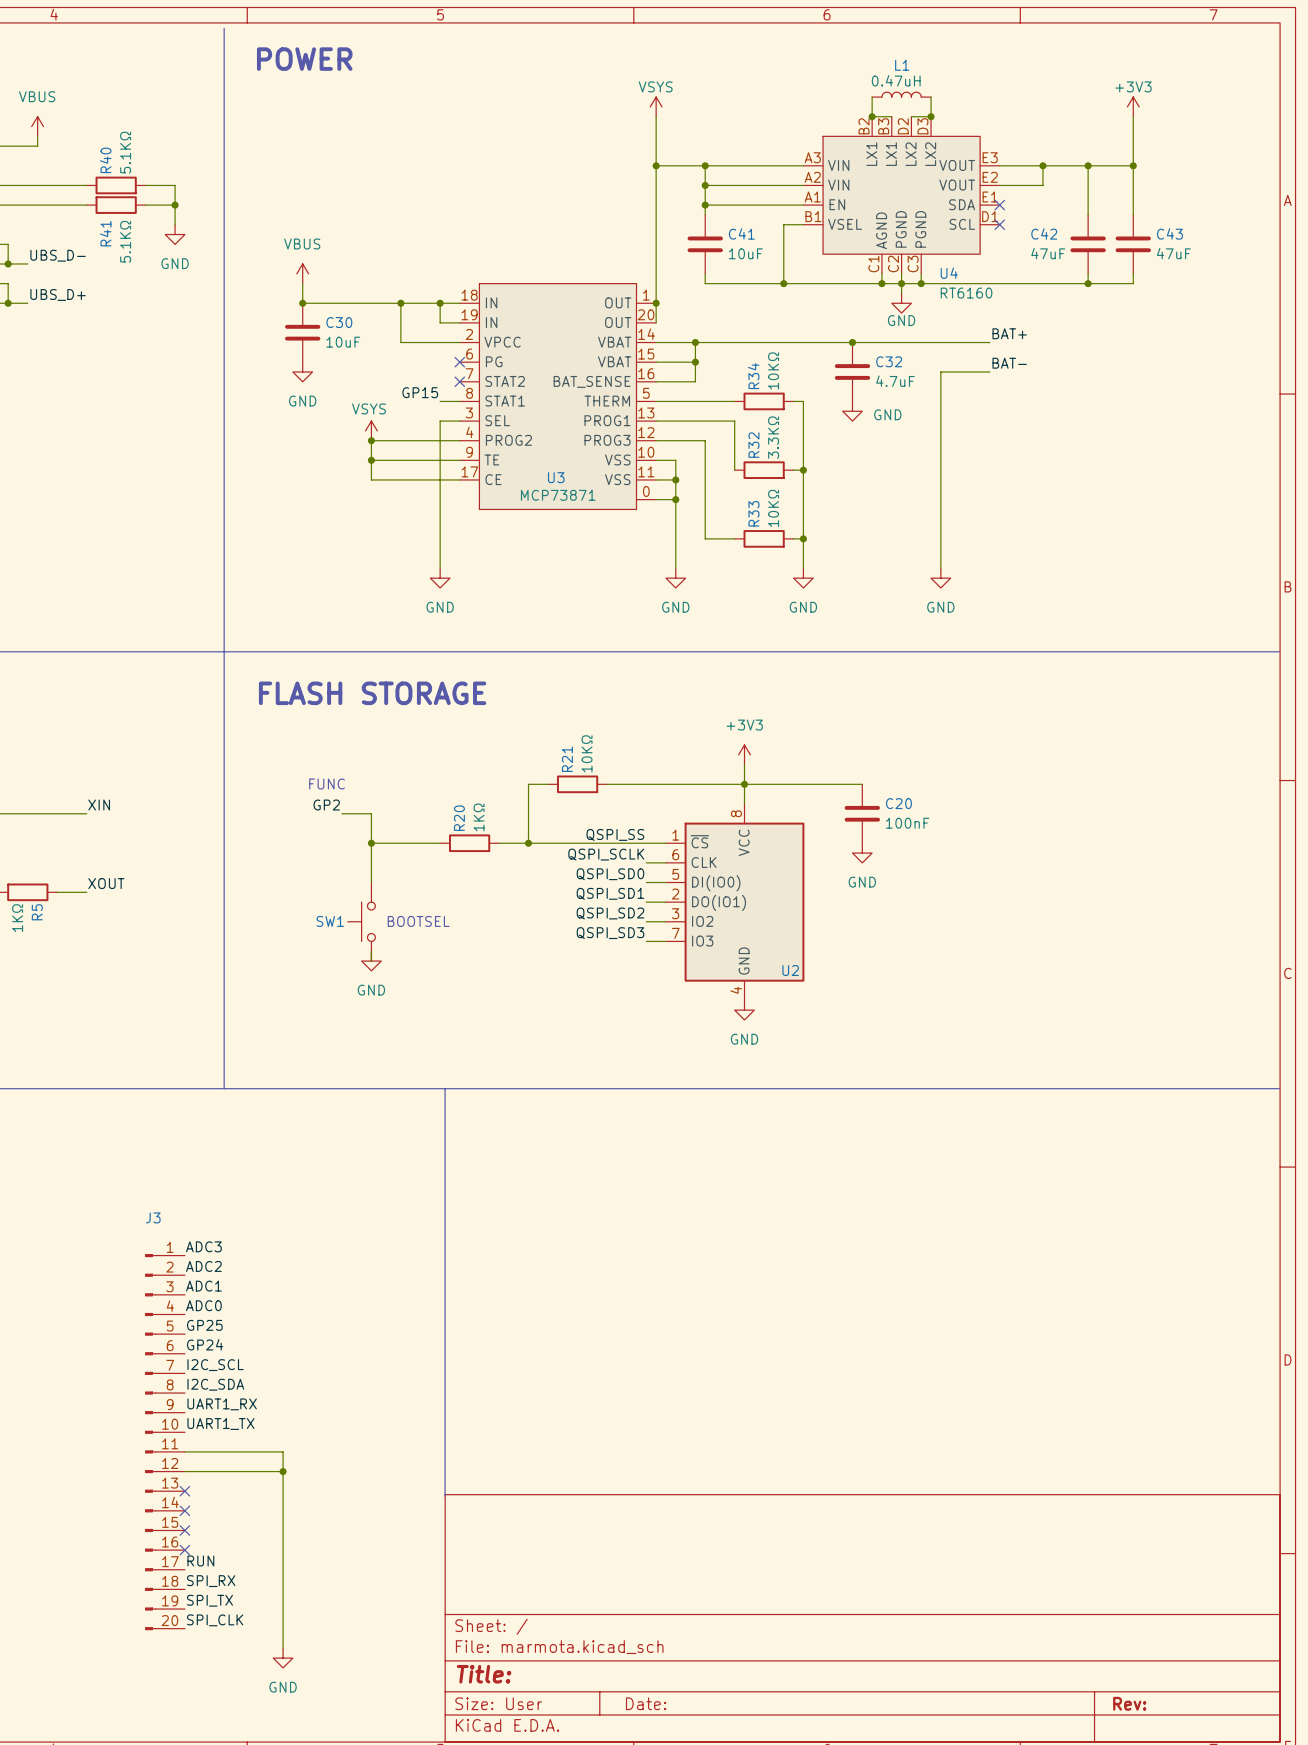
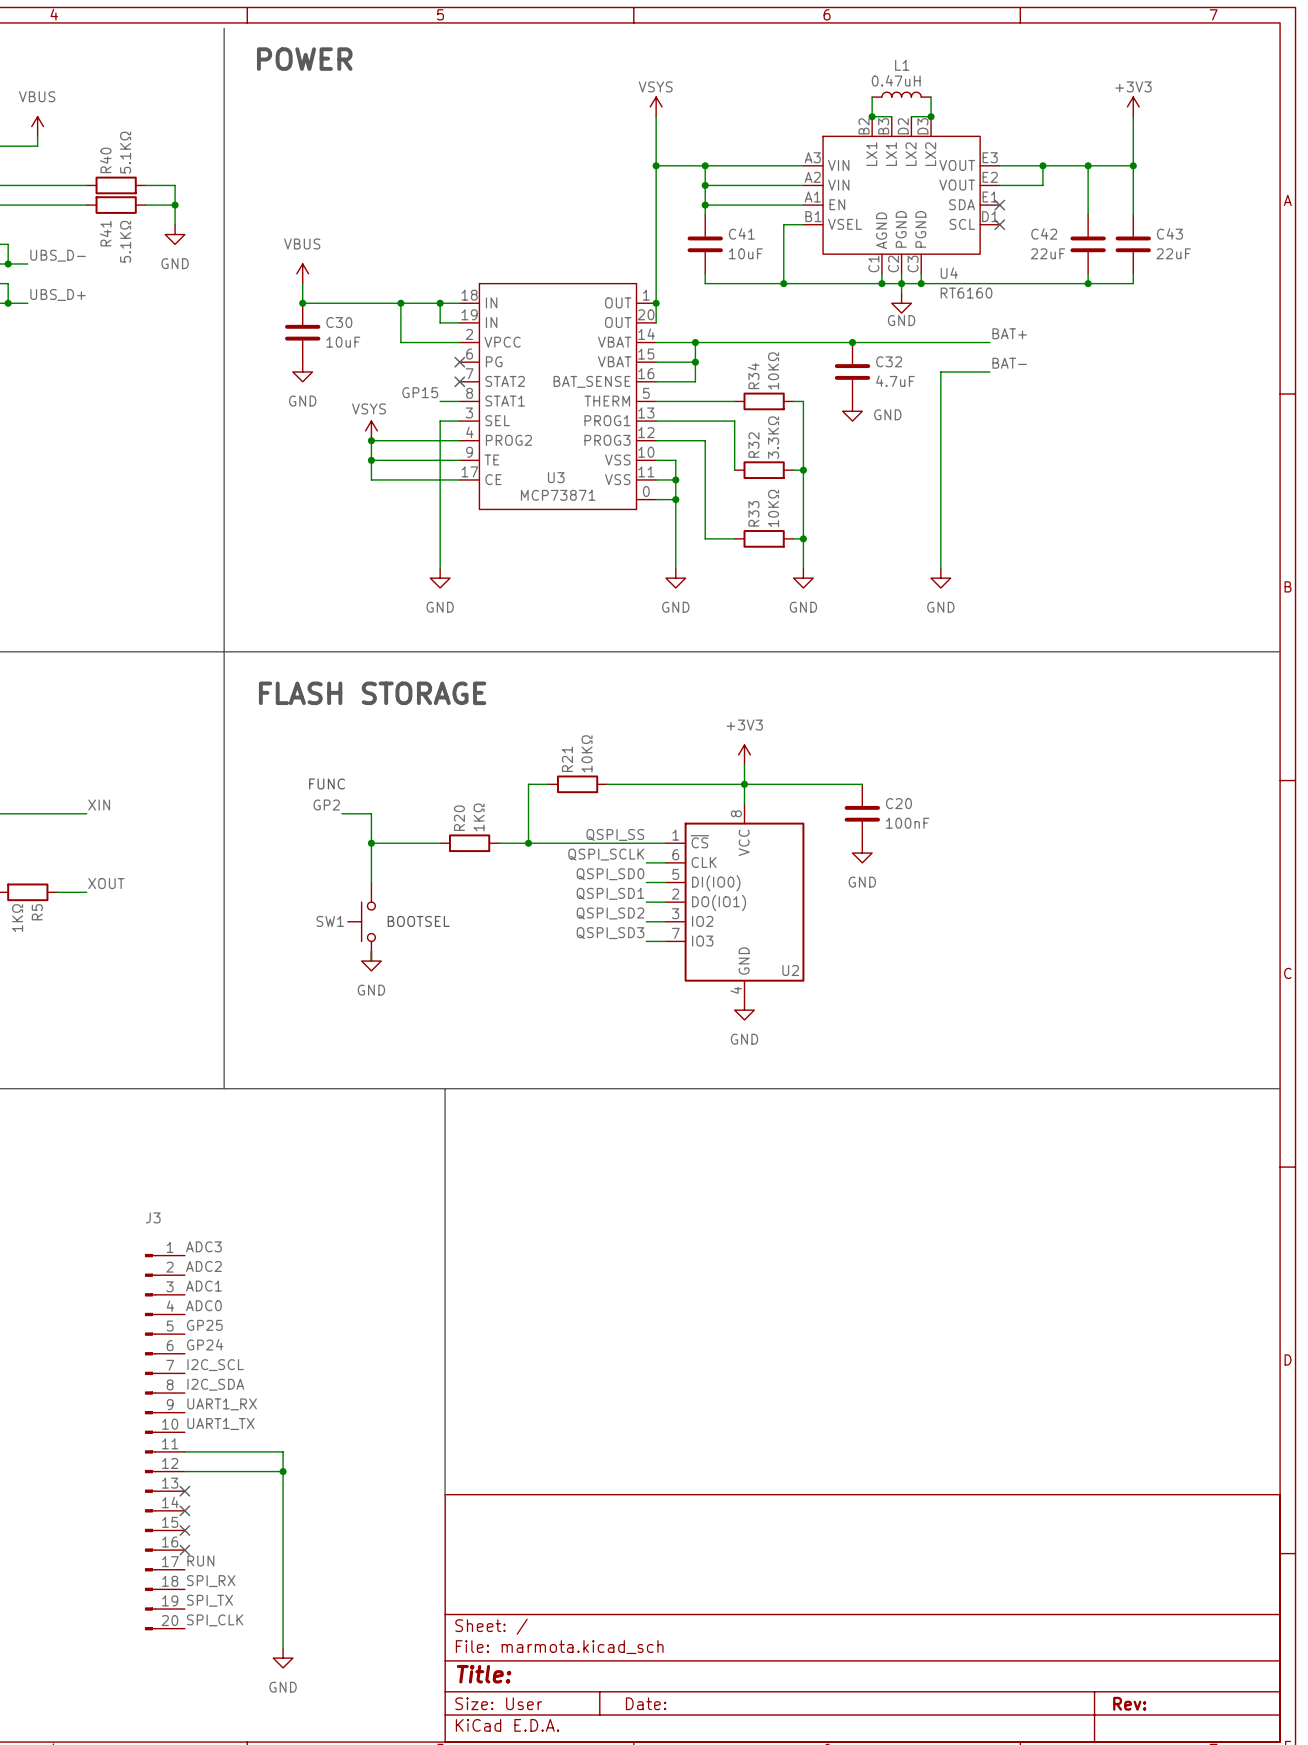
C42 value: 47uF (1048, 253) -> 22uF (1047, 253)
C43 value: 47uF (1173, 253) -> 22uF (1173, 253)

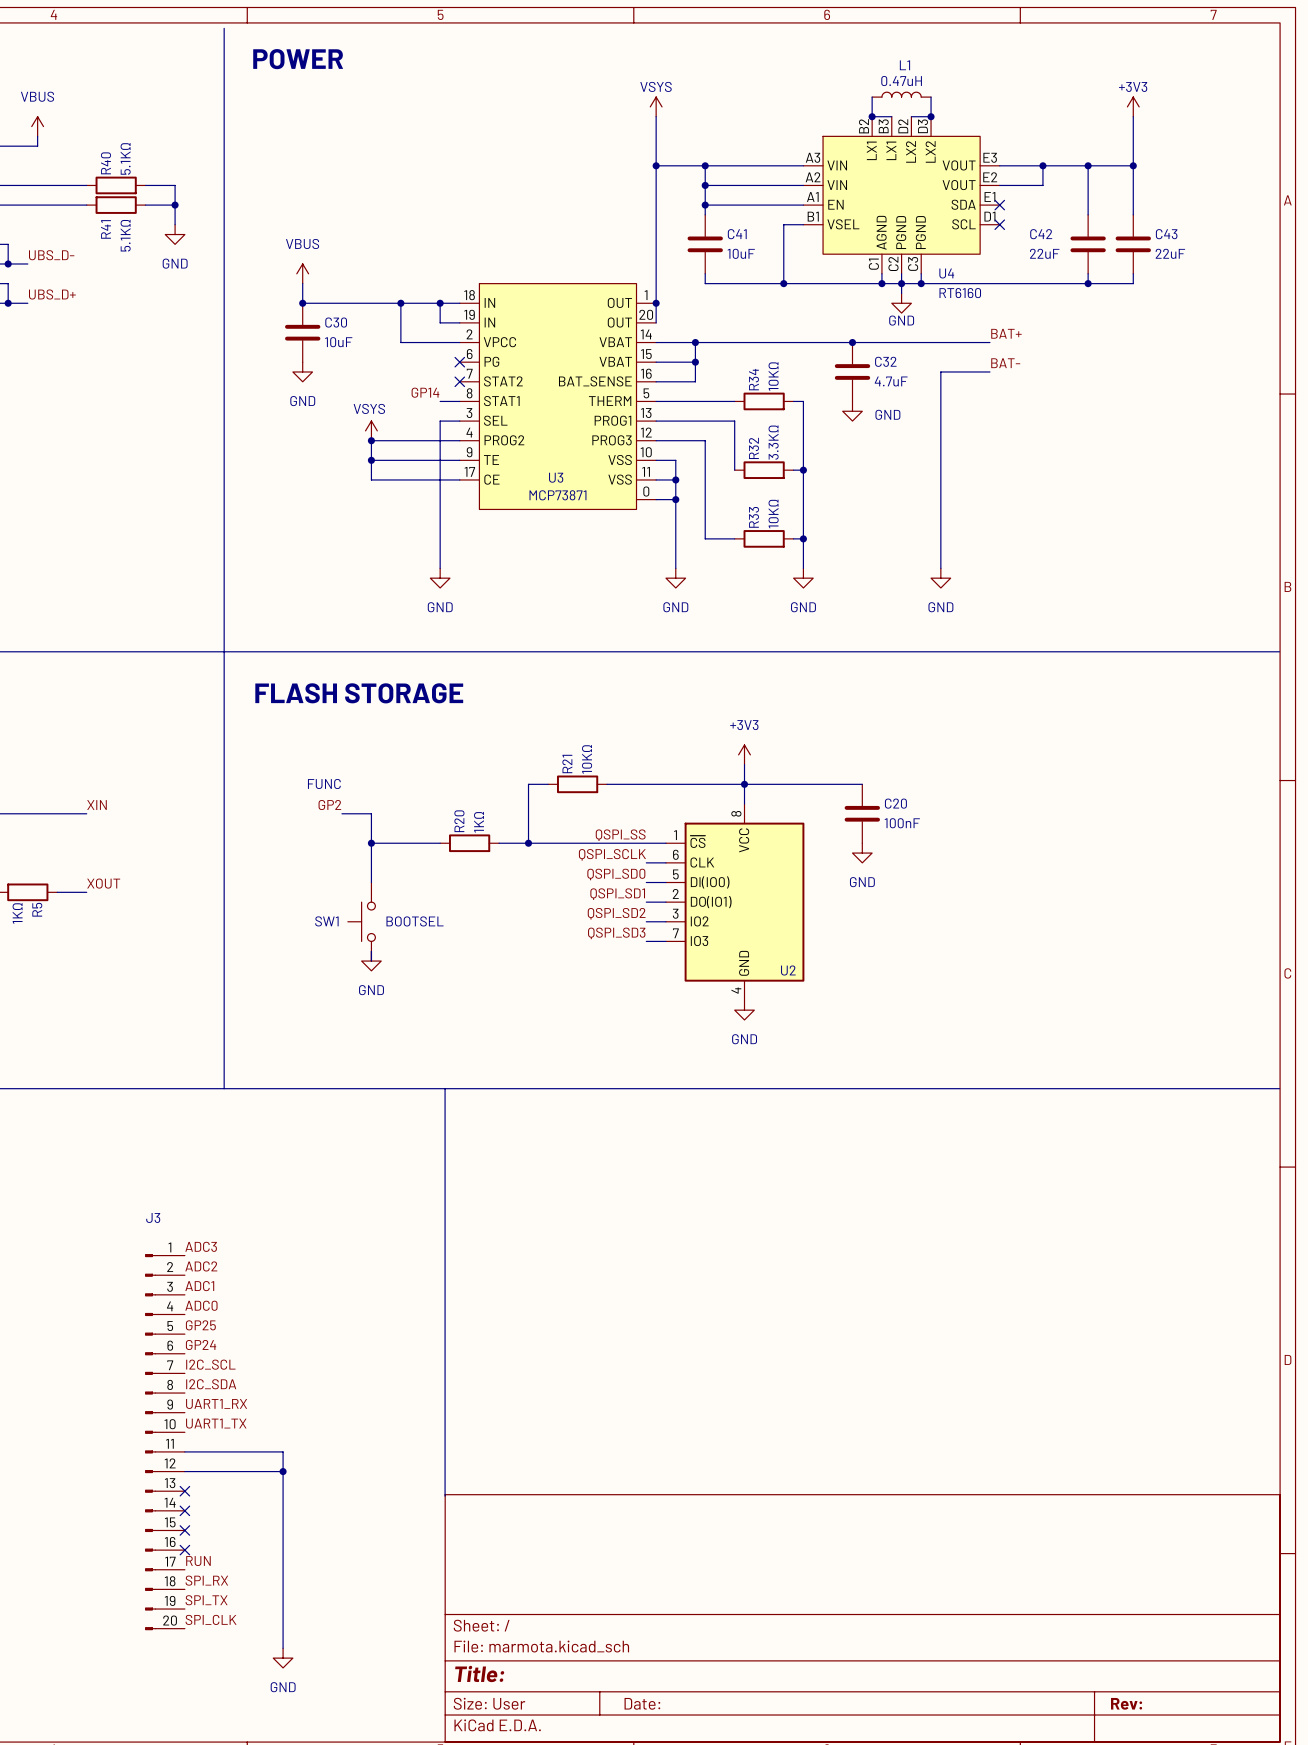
label: GP15 (420, 392) -> GP14 (425, 392)

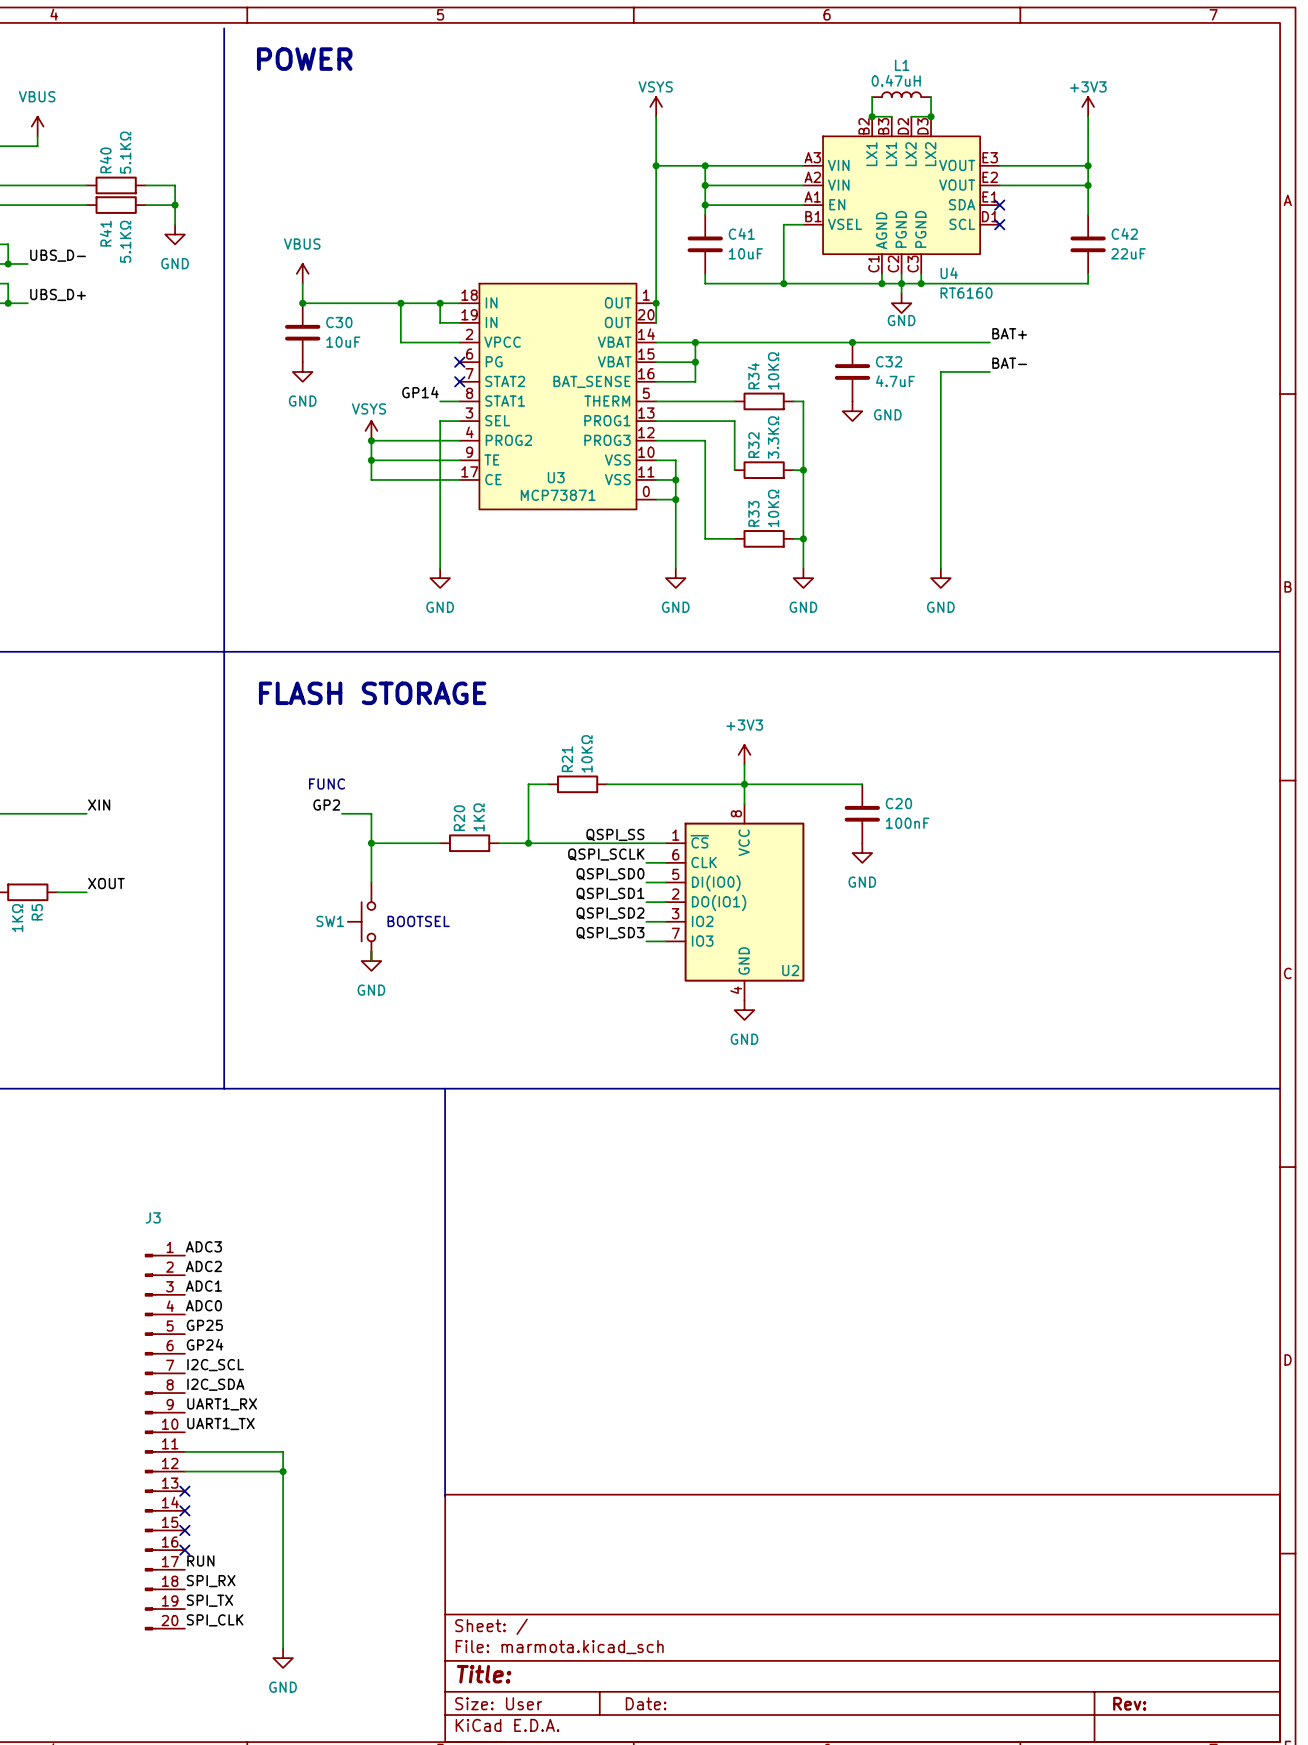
power symbol position: +3V3 (1133, 106) -> +3V3 (1088, 106)
wire: (1133, 116) (1133, 214) -> none
wire: (1042, 165) (1042, 185) -> (1088, 185) (1042, 185)
junction: (1042, 165) -> none
wire: (1088, 165) (1133, 165) -> (1088, 165) (1088, 116)
junction: (1133, 165) -> none
junction: none -> (1088, 185)
C42 name position: C42 (1041, 234) -> C42 (1124, 233)
C43: 22uF (1133, 244) -> none
C42 value position: 22uF (1044, 253) -> 22uF (1128, 253)
wire: (1133, 273) (1133, 283) (1088, 283) -> none
junction: (1088, 283) -> none

